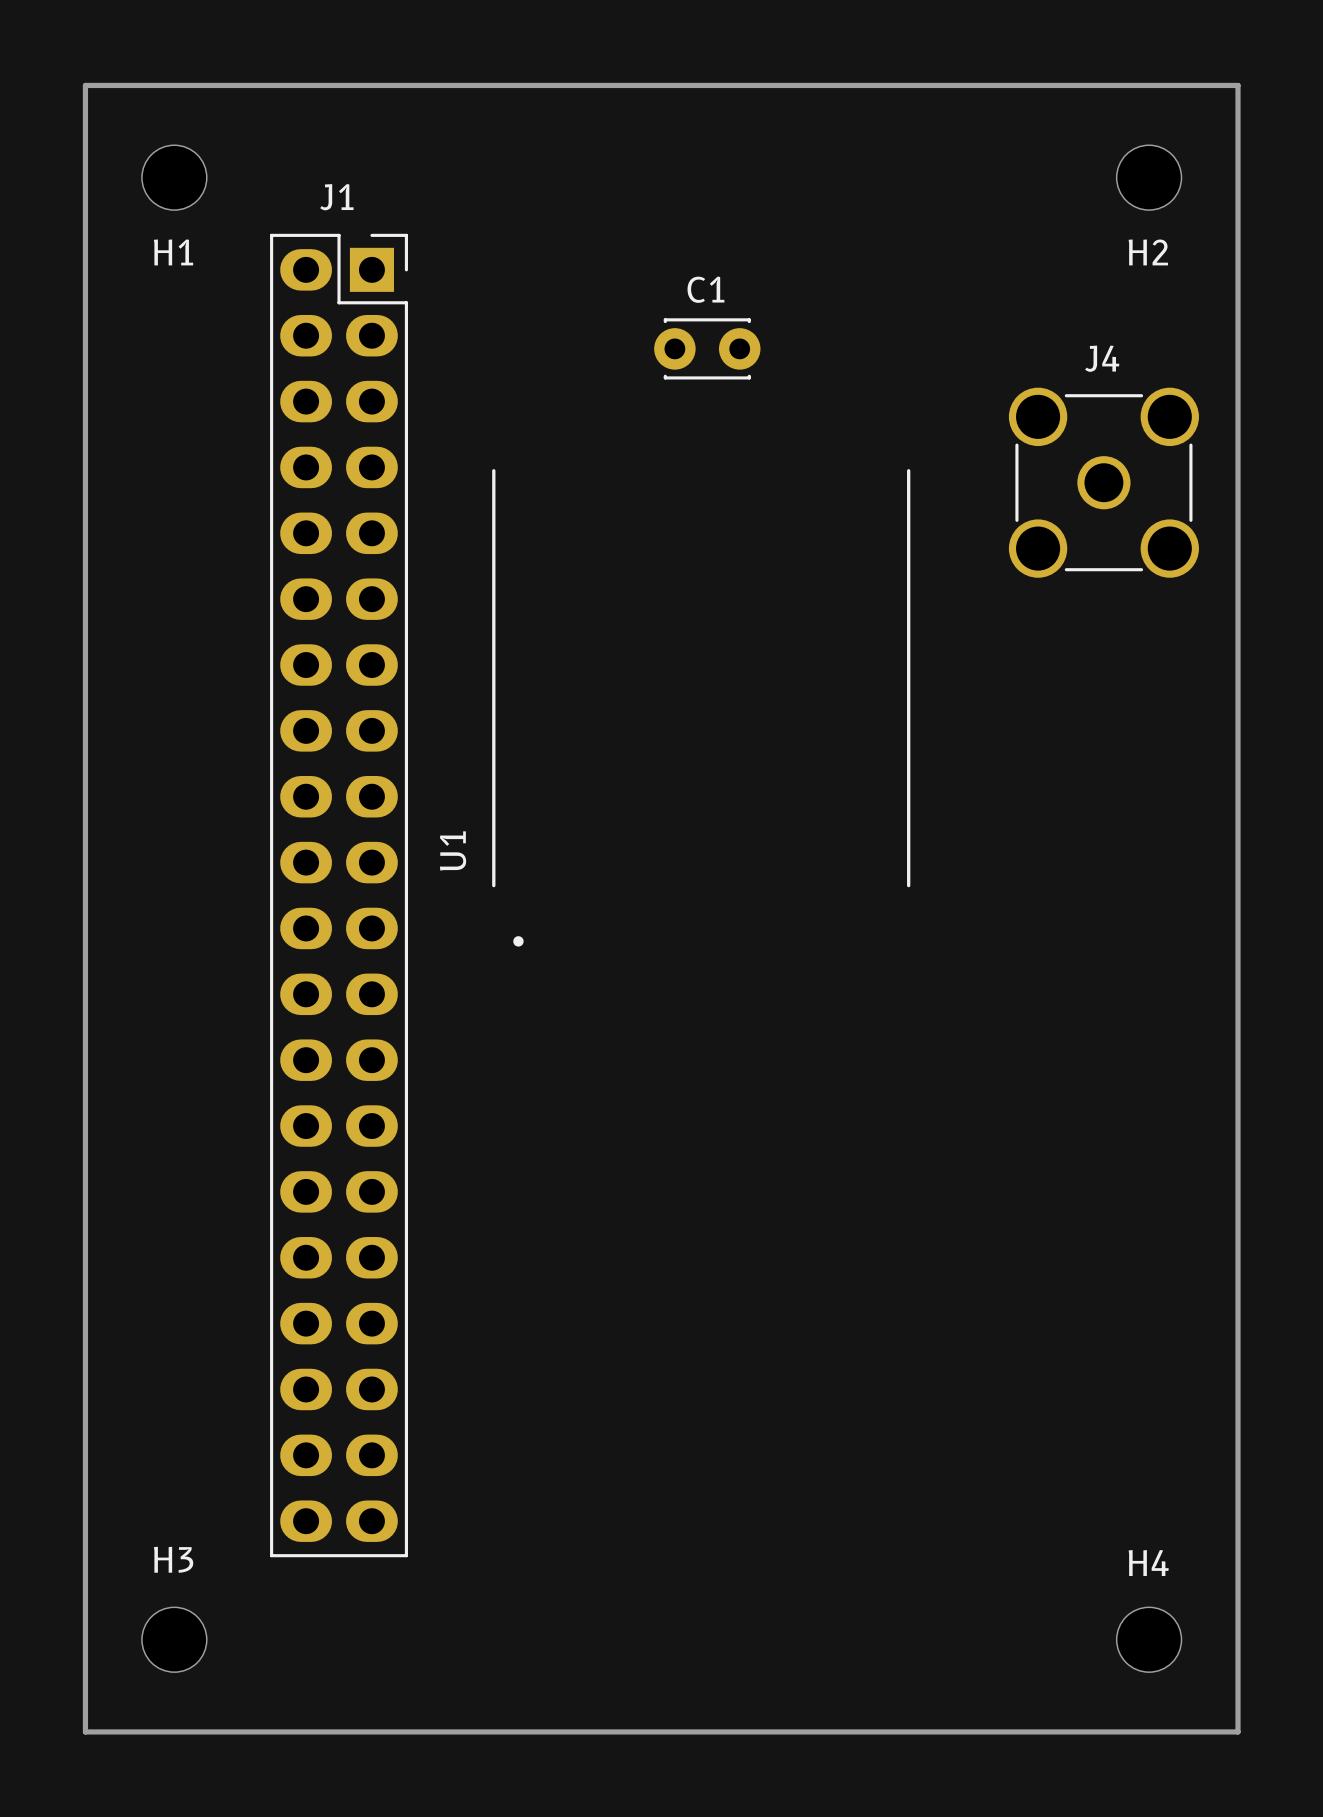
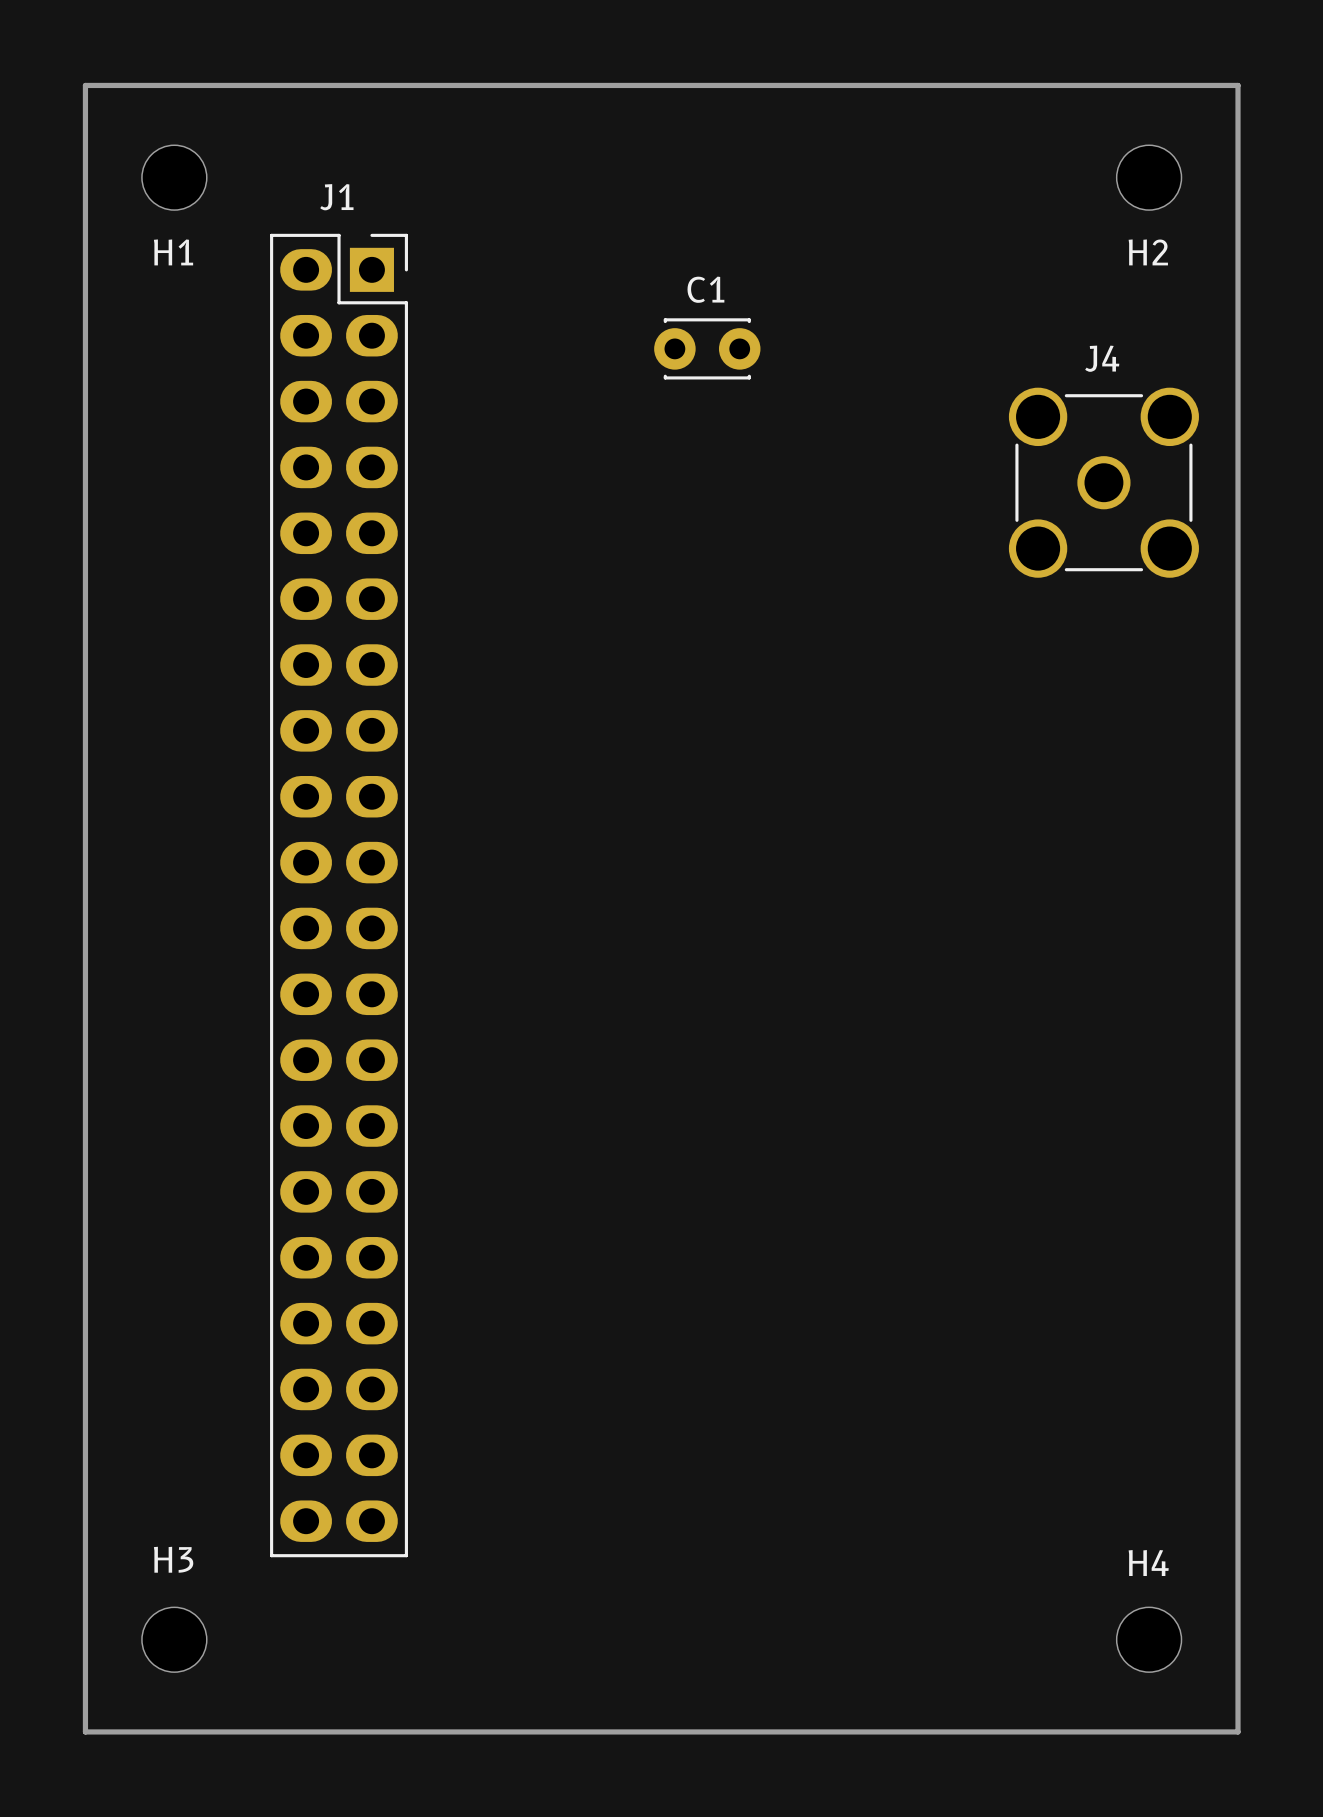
U1: (701, 707) -> none

